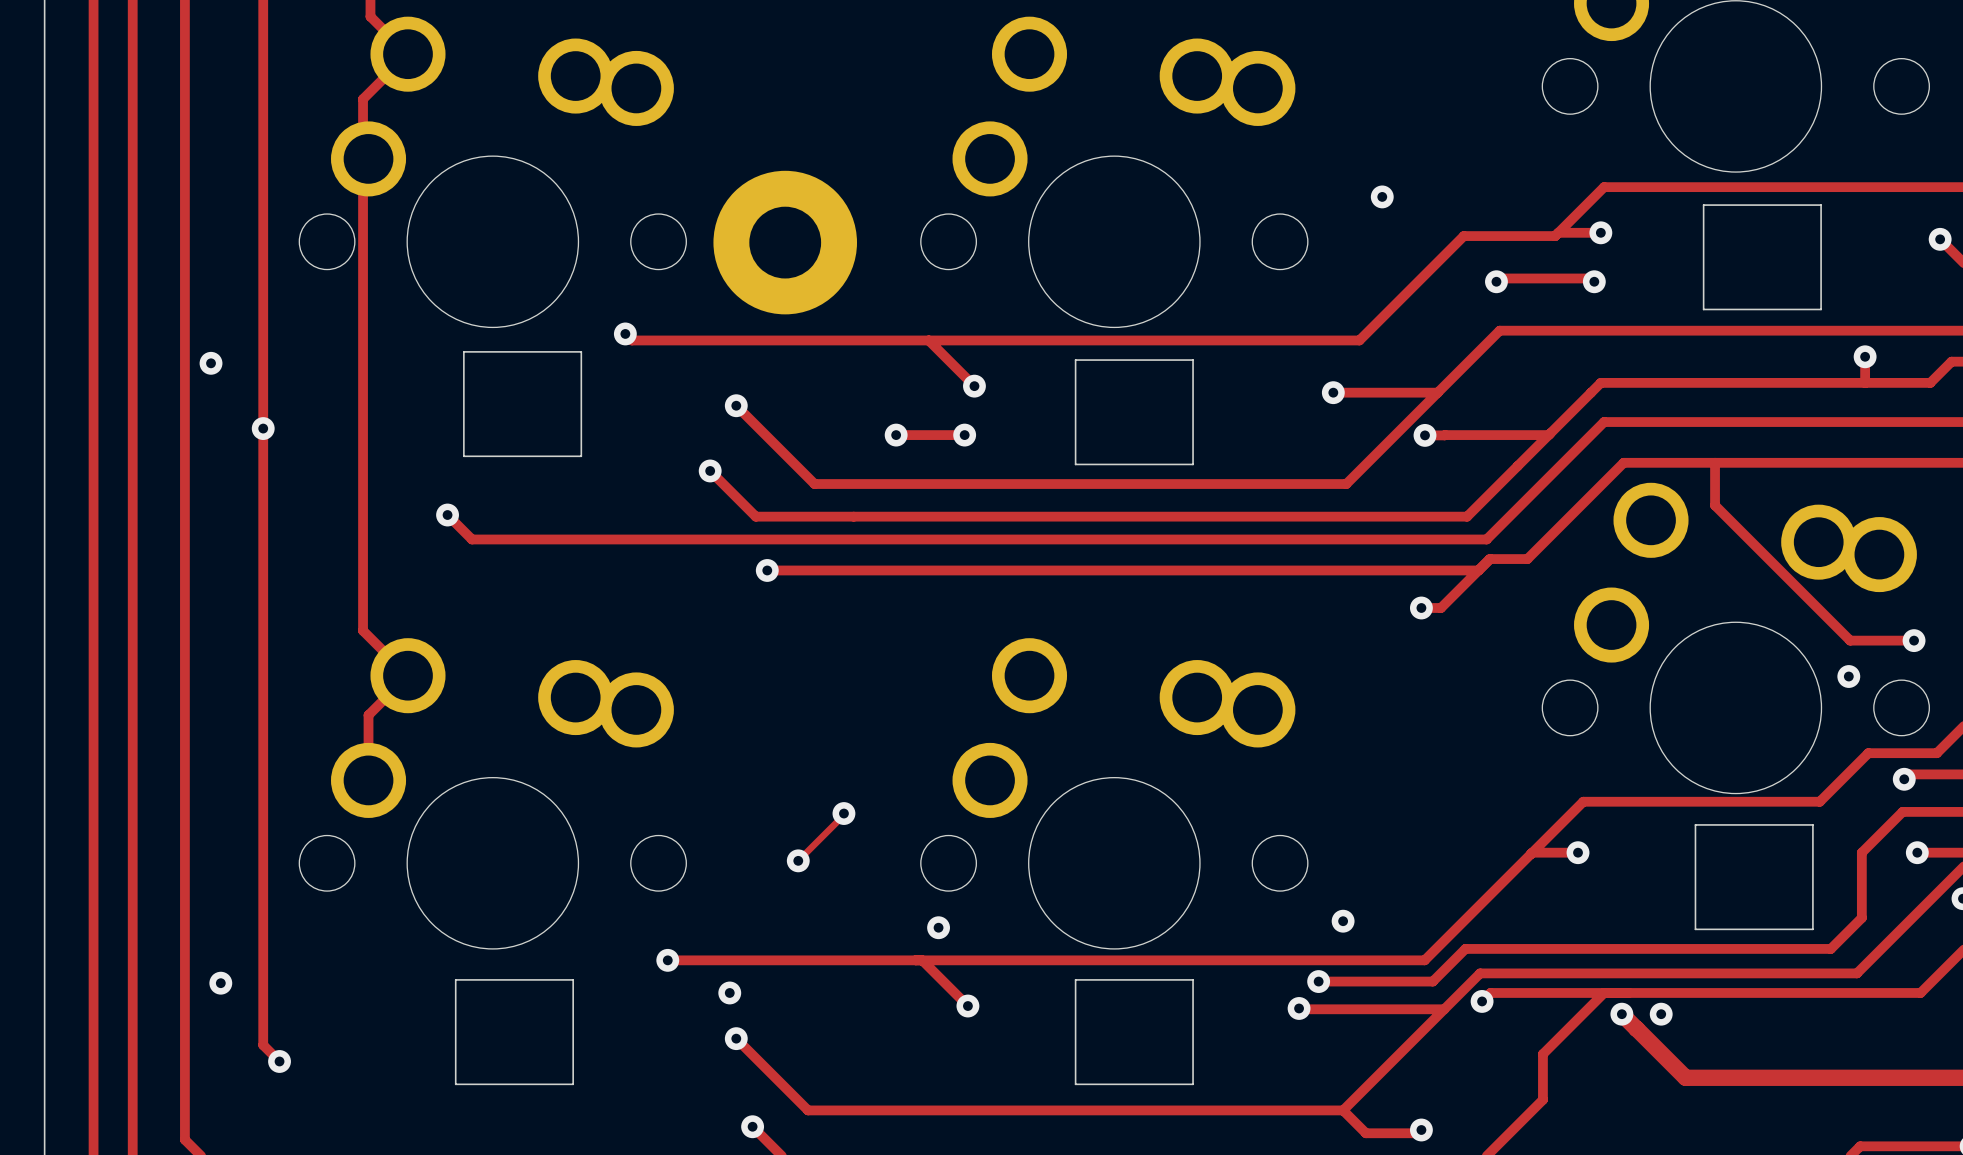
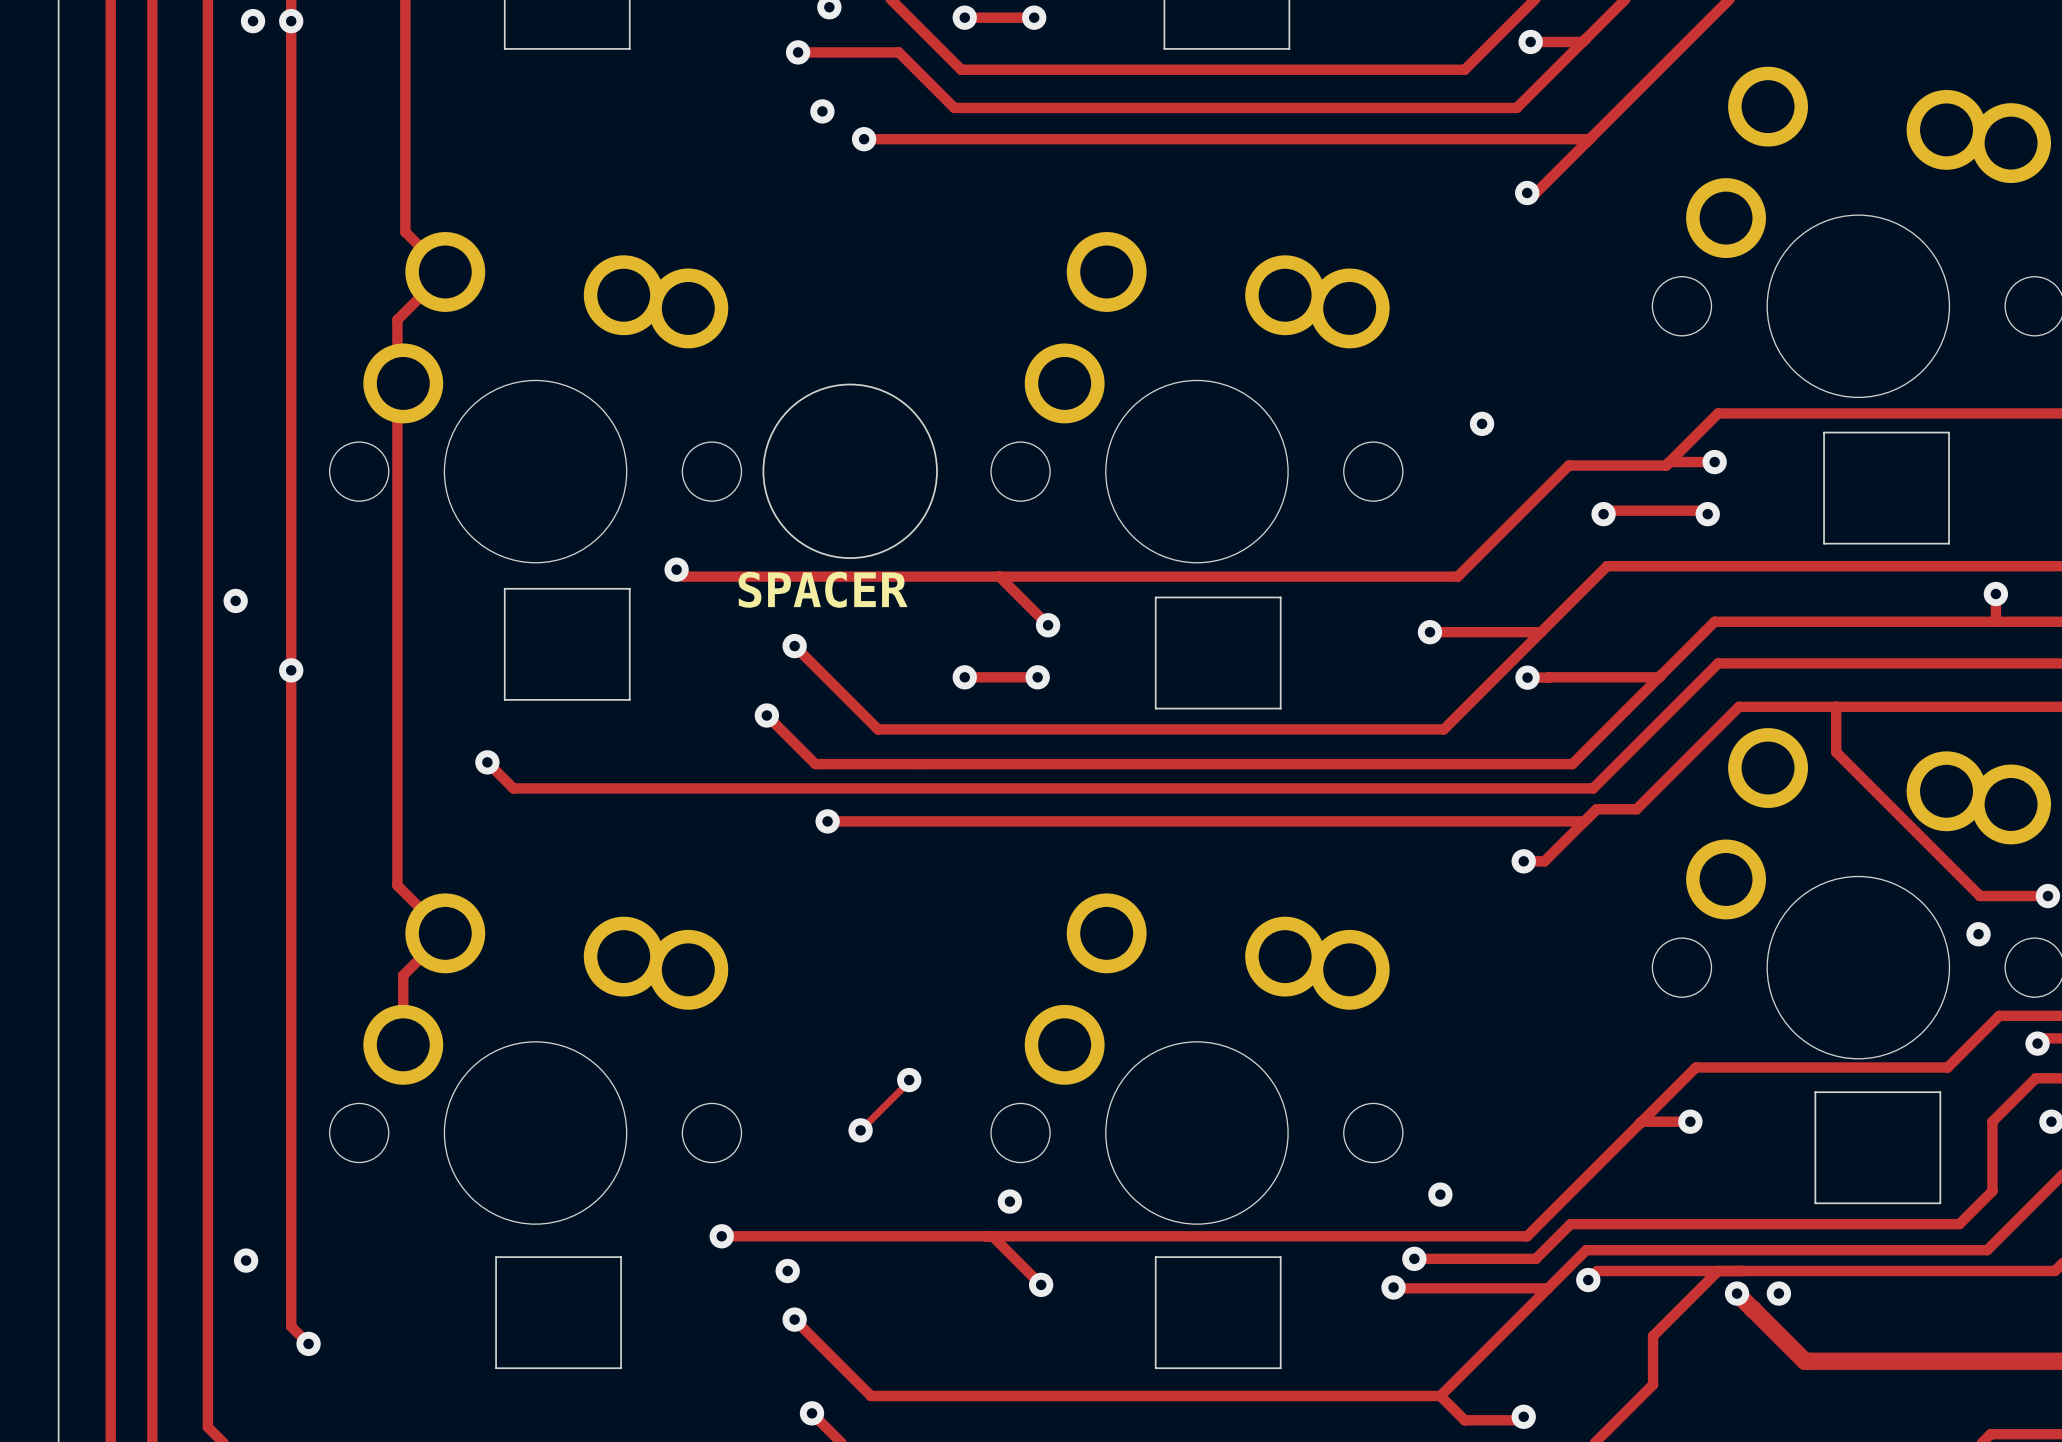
round board edge: none -> [762, 383, 938, 559]
part: (785, 242) -> none
text: none -> SPACER (823, 589)

